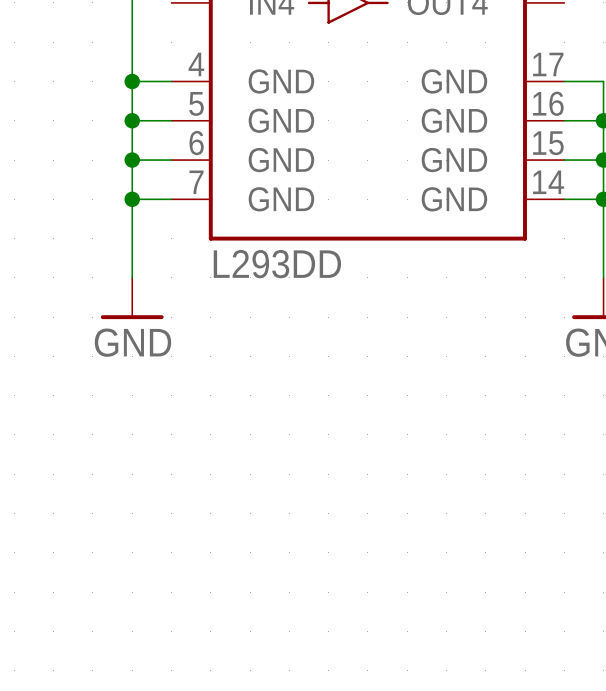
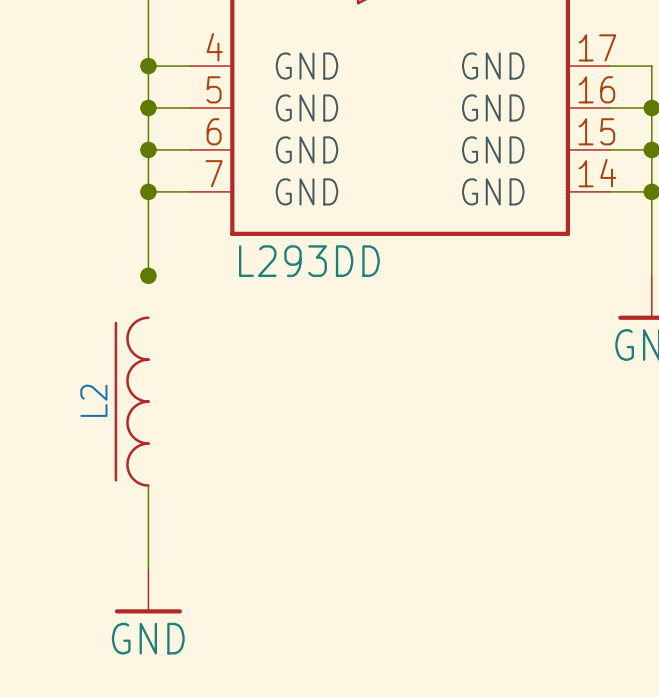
junction: none -> (148, 275)
power symbol position: GND (132, 298) -> GND (148, 591)
L2: none -> (132, 401)
wire: none -> (148, 485) (148, 569)

